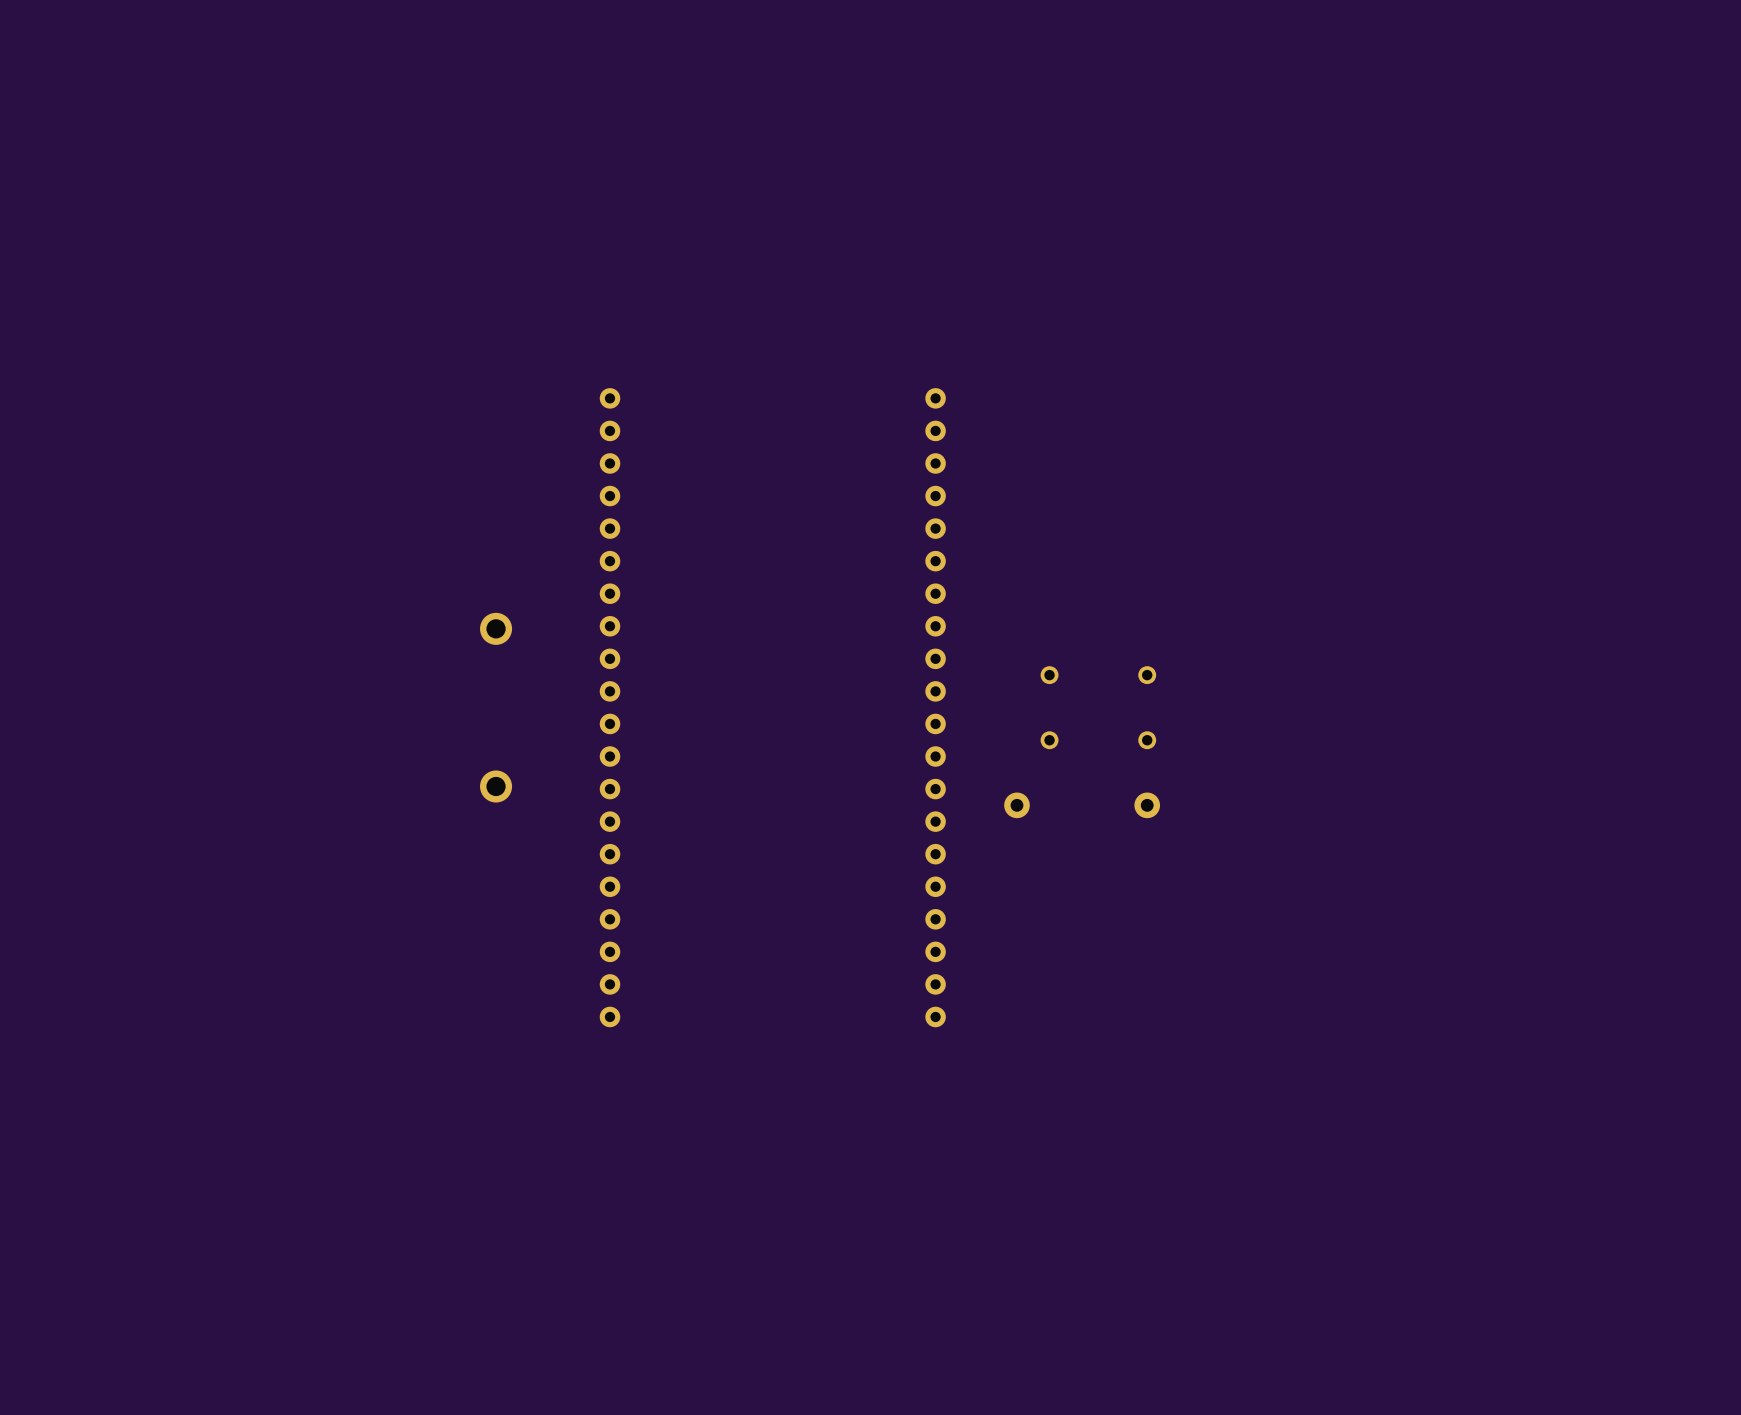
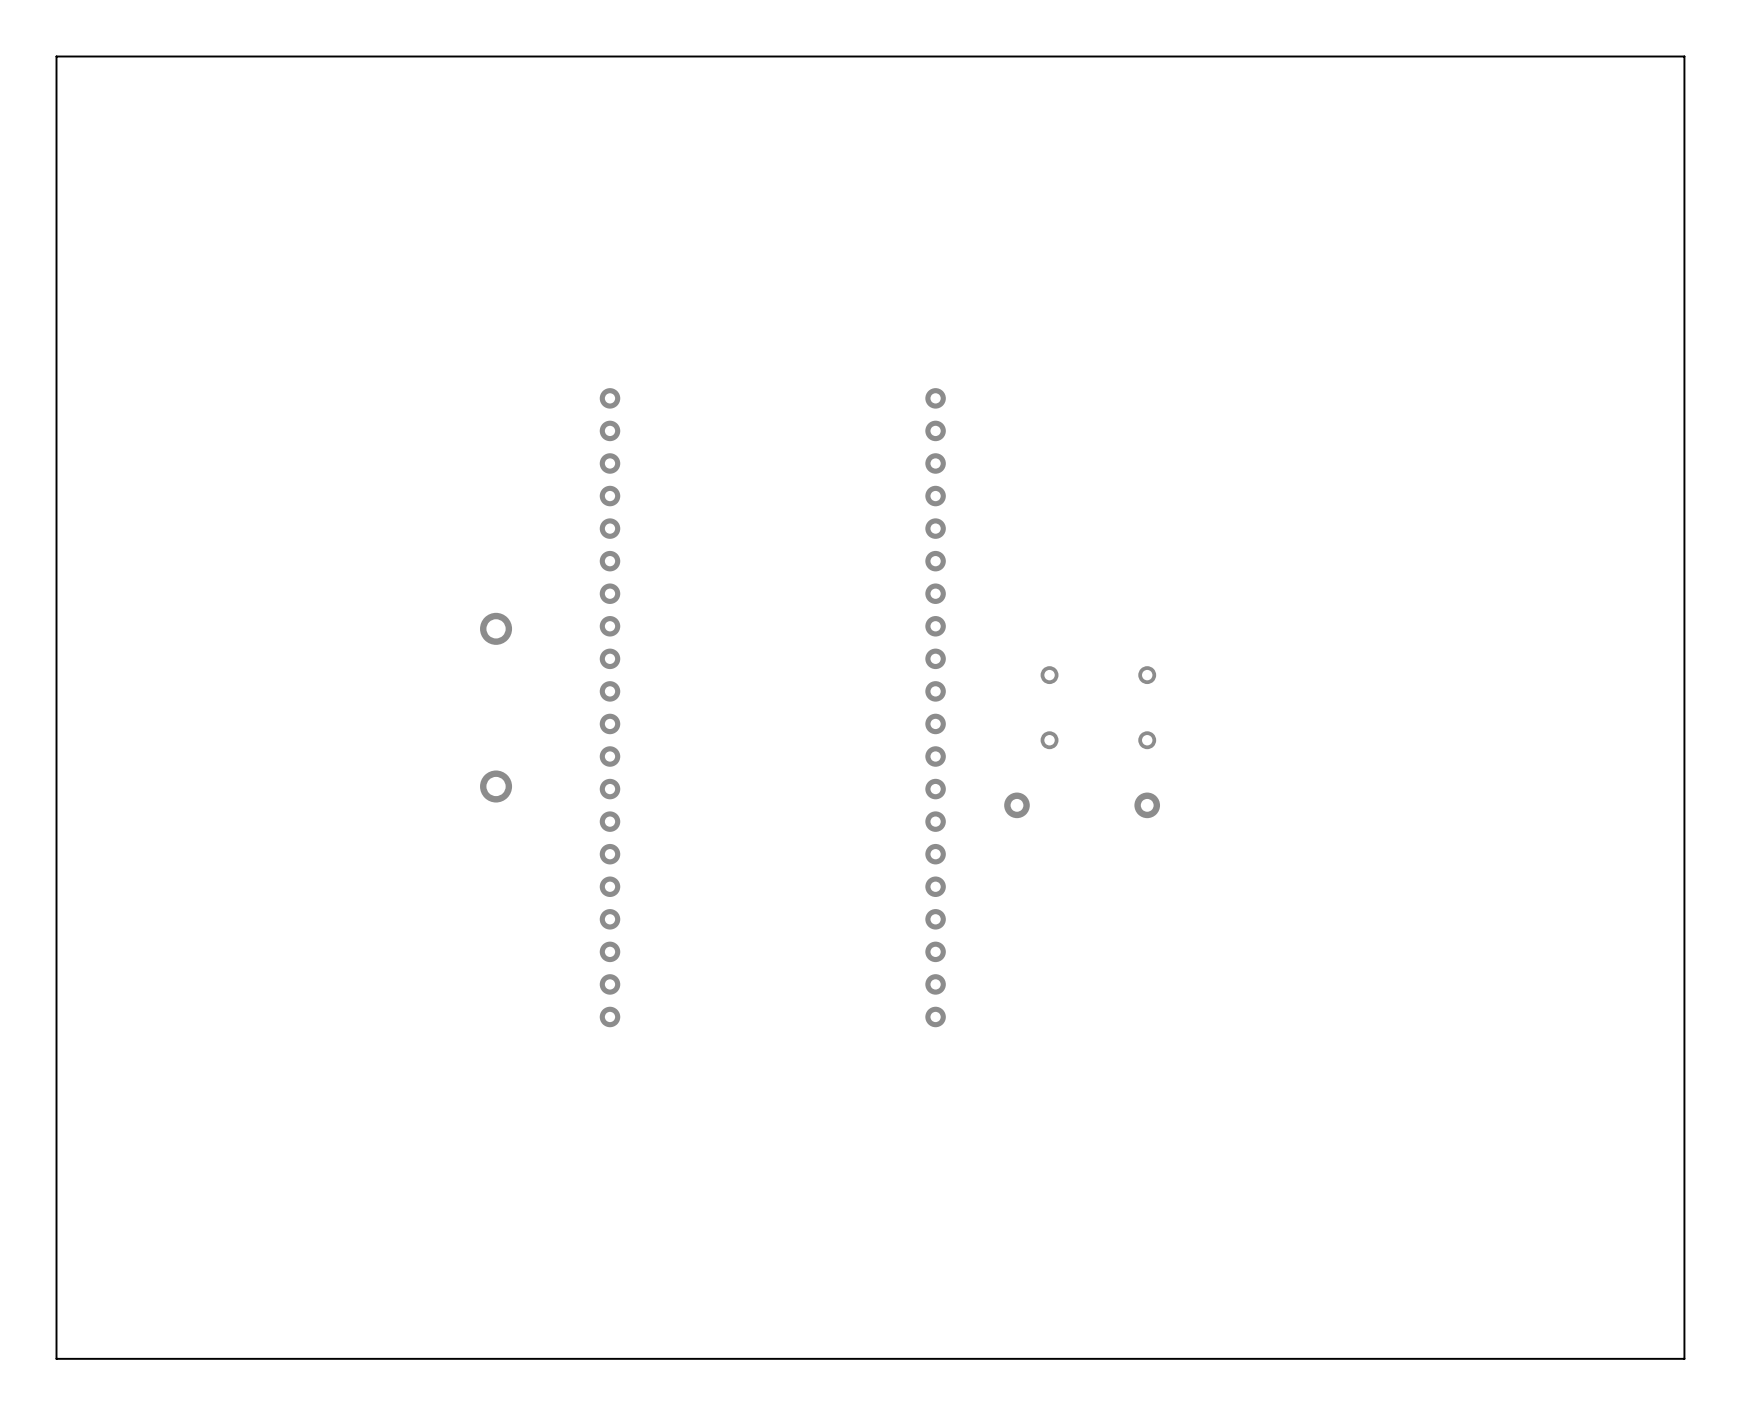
board edge: none -> (1684, 56) (1684, 1358) (56, 1358) (56, 56) (1684, 56)

